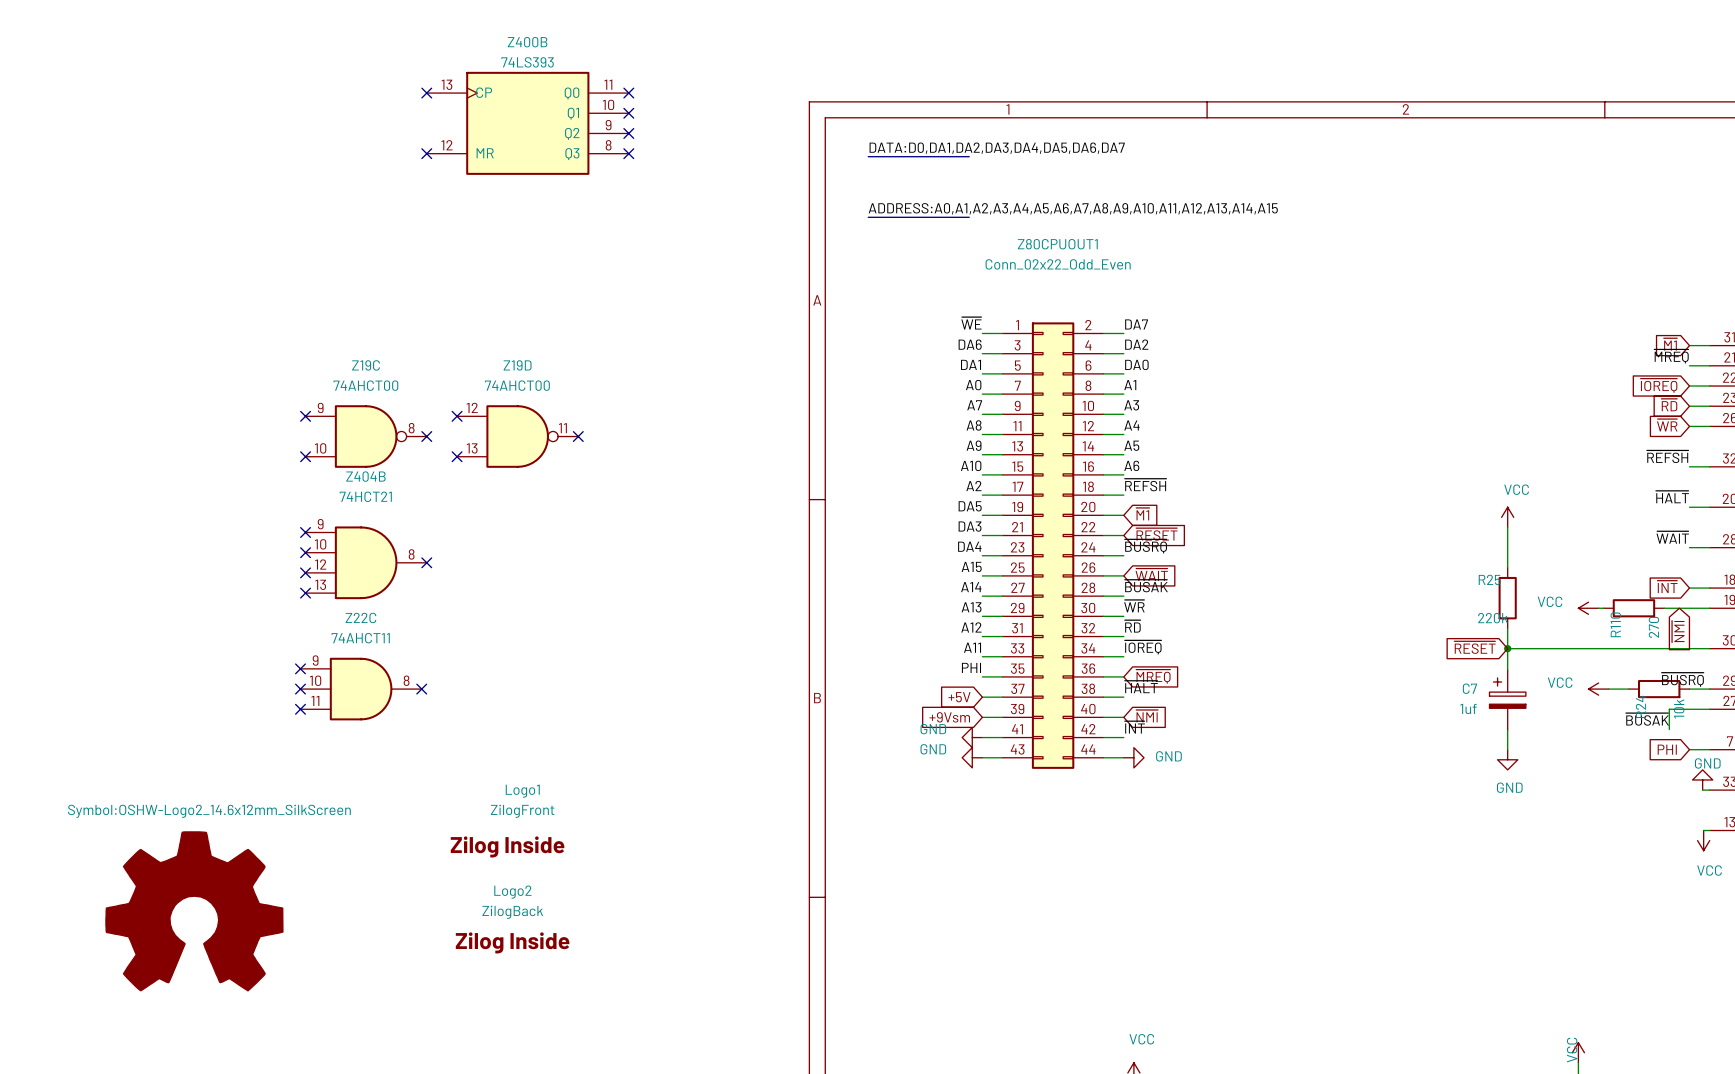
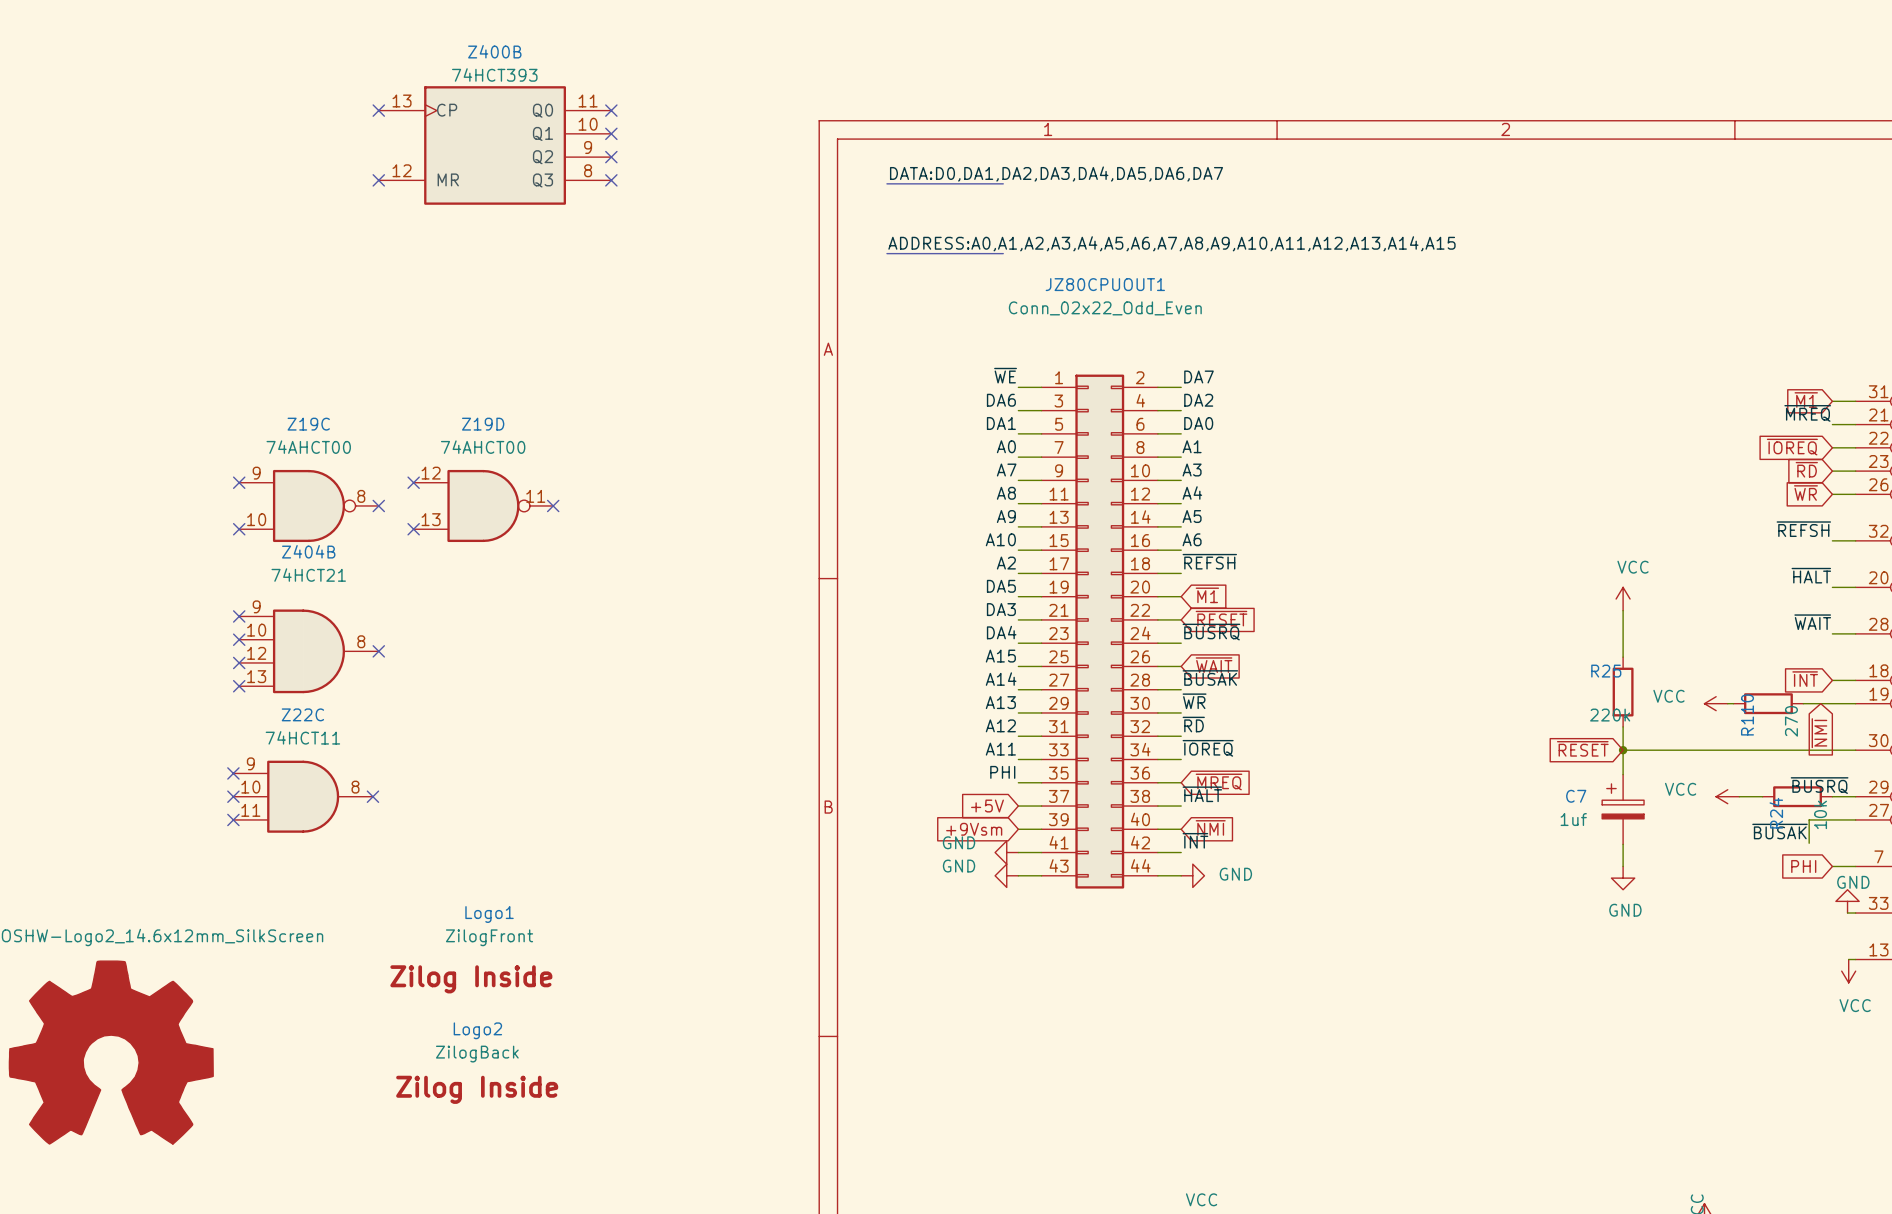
Z400B value: 74LS393 (527, 62) -> 74HCT393 (494, 74)
Z80CPUOUT1 name: Z80CPUOUT1 (1057, 244) -> JZ80CPUOUT1 (1105, 284)
Z22C value: 74AHCT11 (360, 638) -> 74HCT11 (302, 737)

